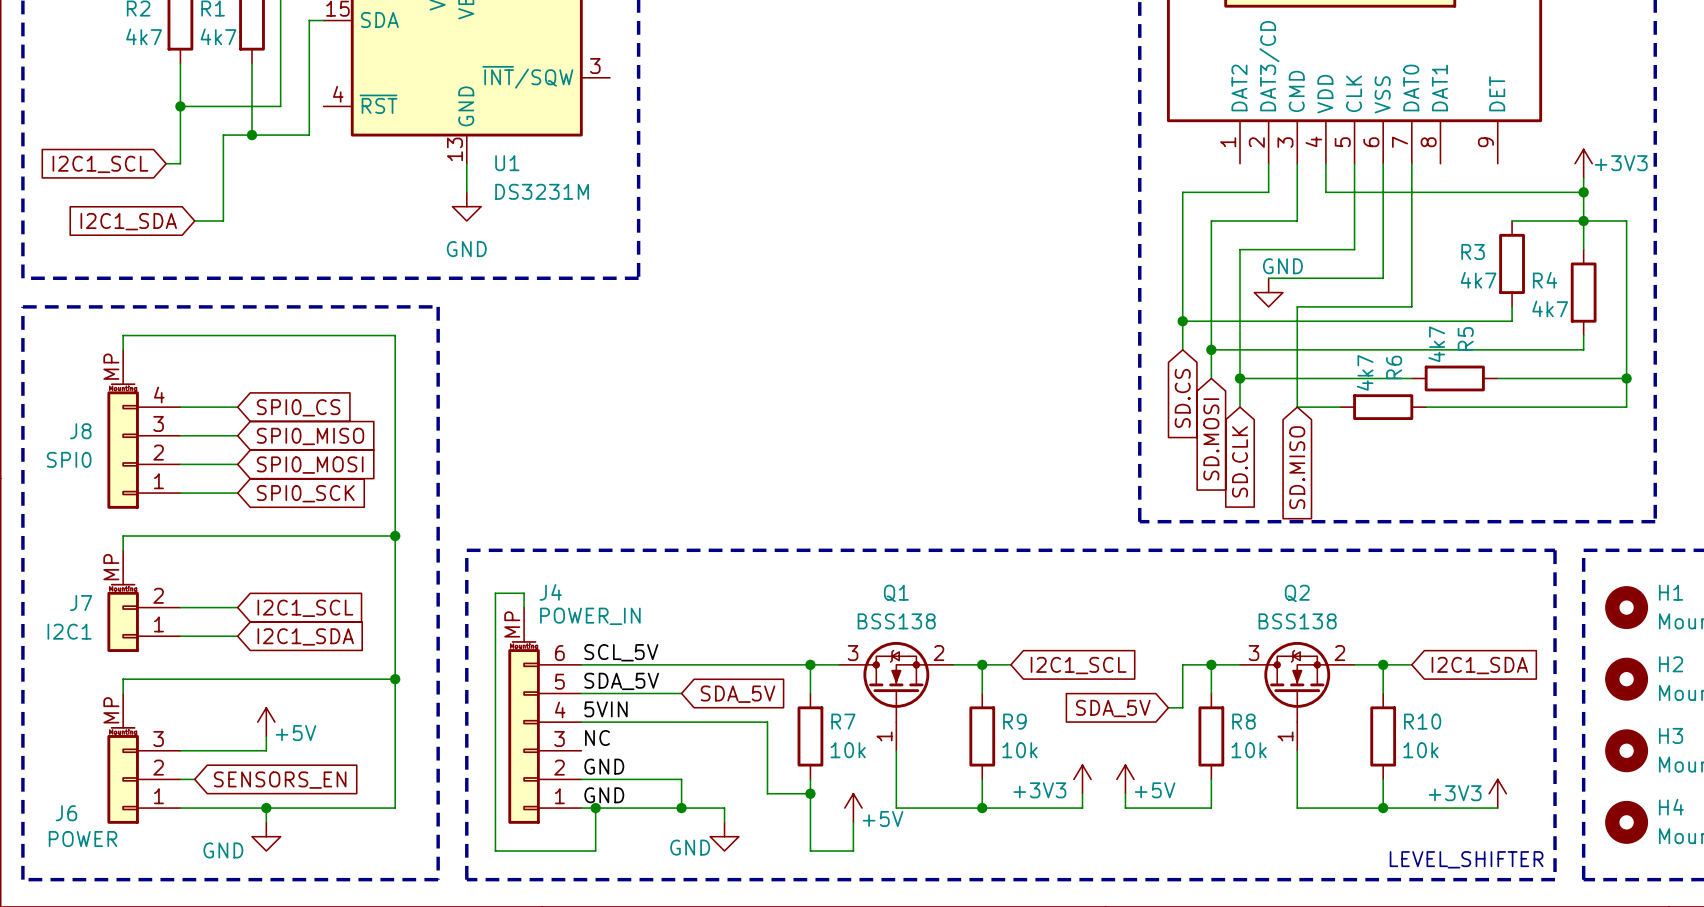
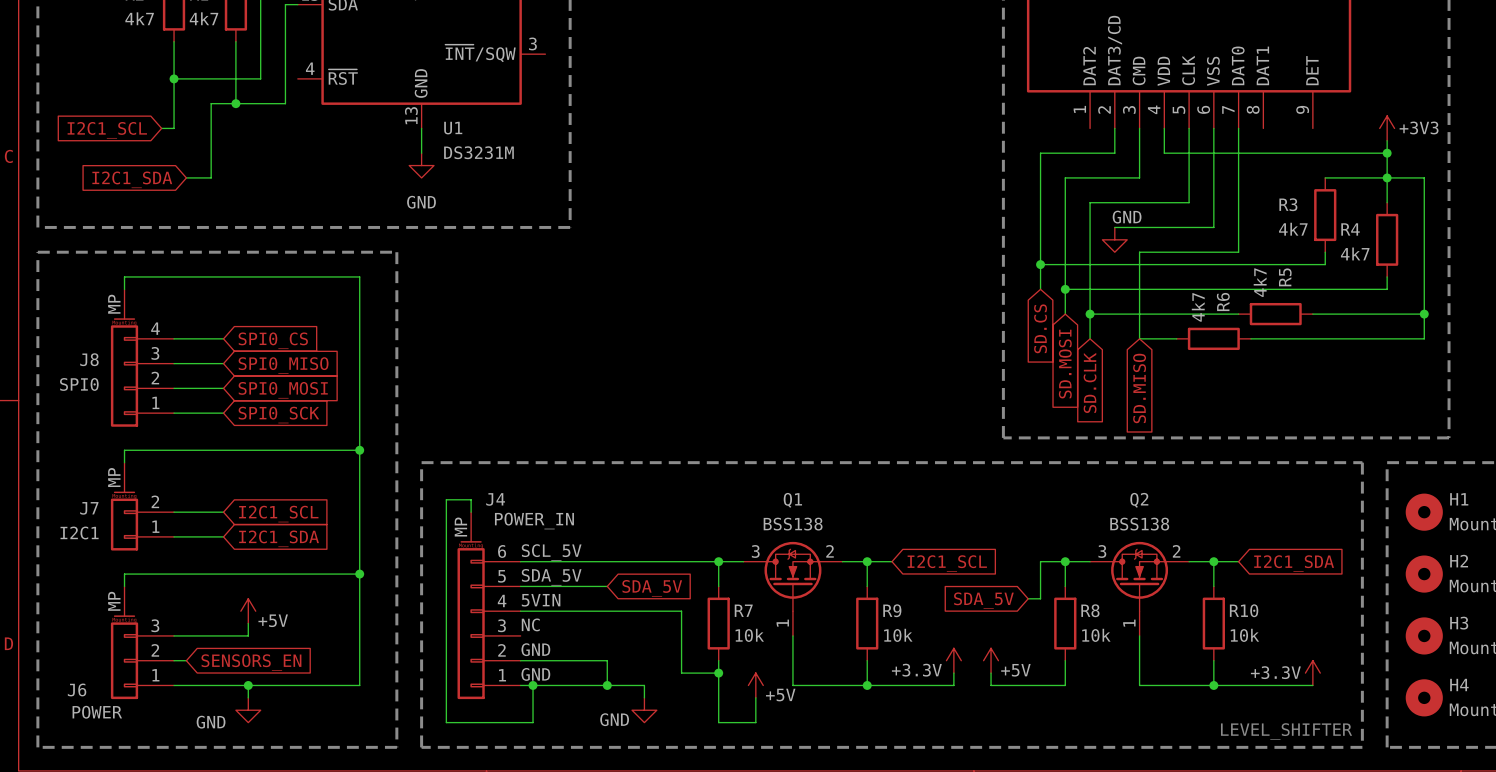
power symbol: +3V3 (1082, 779) -> +3.3V (953, 660)
power symbol: +3V3 (1497, 793) -> +3.3V (1312, 673)

